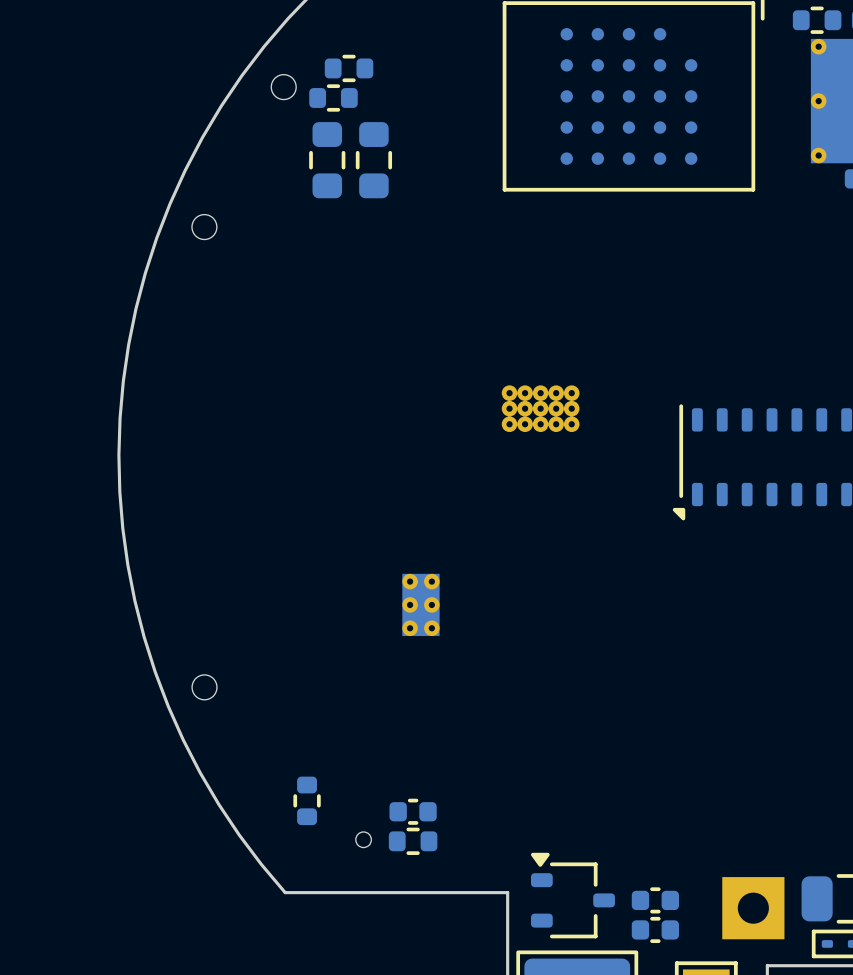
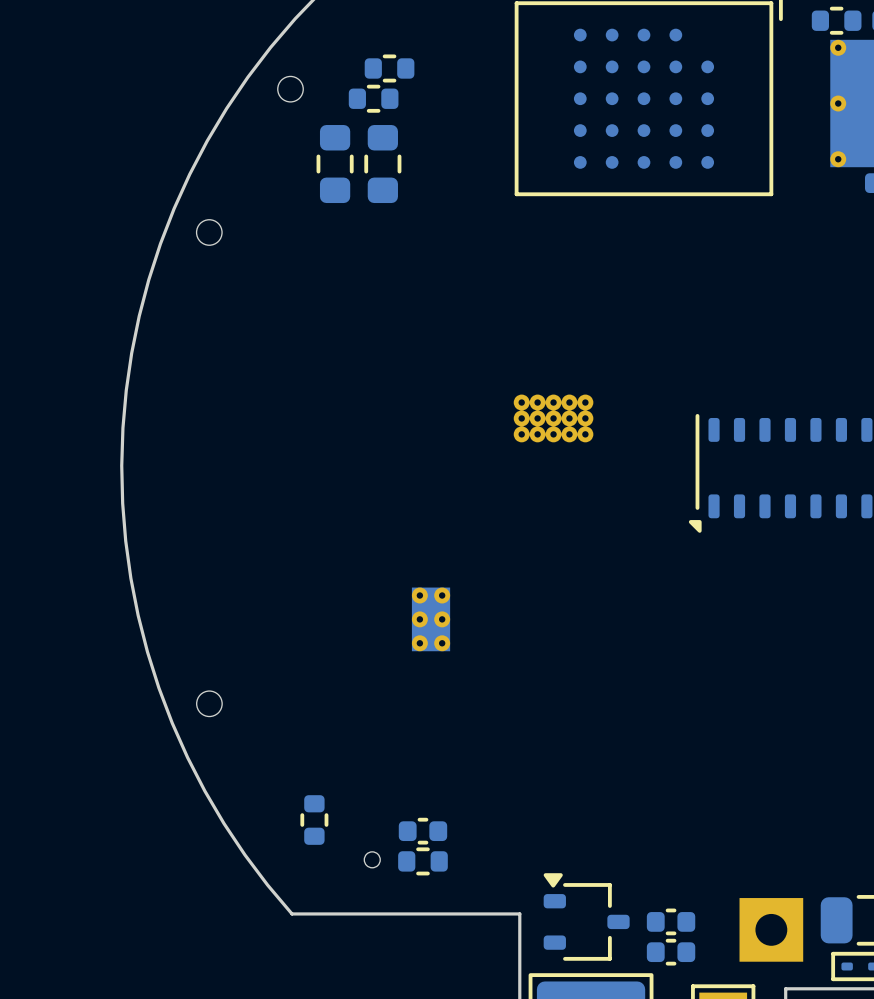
part: none -> (389, 68)
part: (349, 68) -> none
part: none -> (373, 98)
part: (333, 97) -> none

